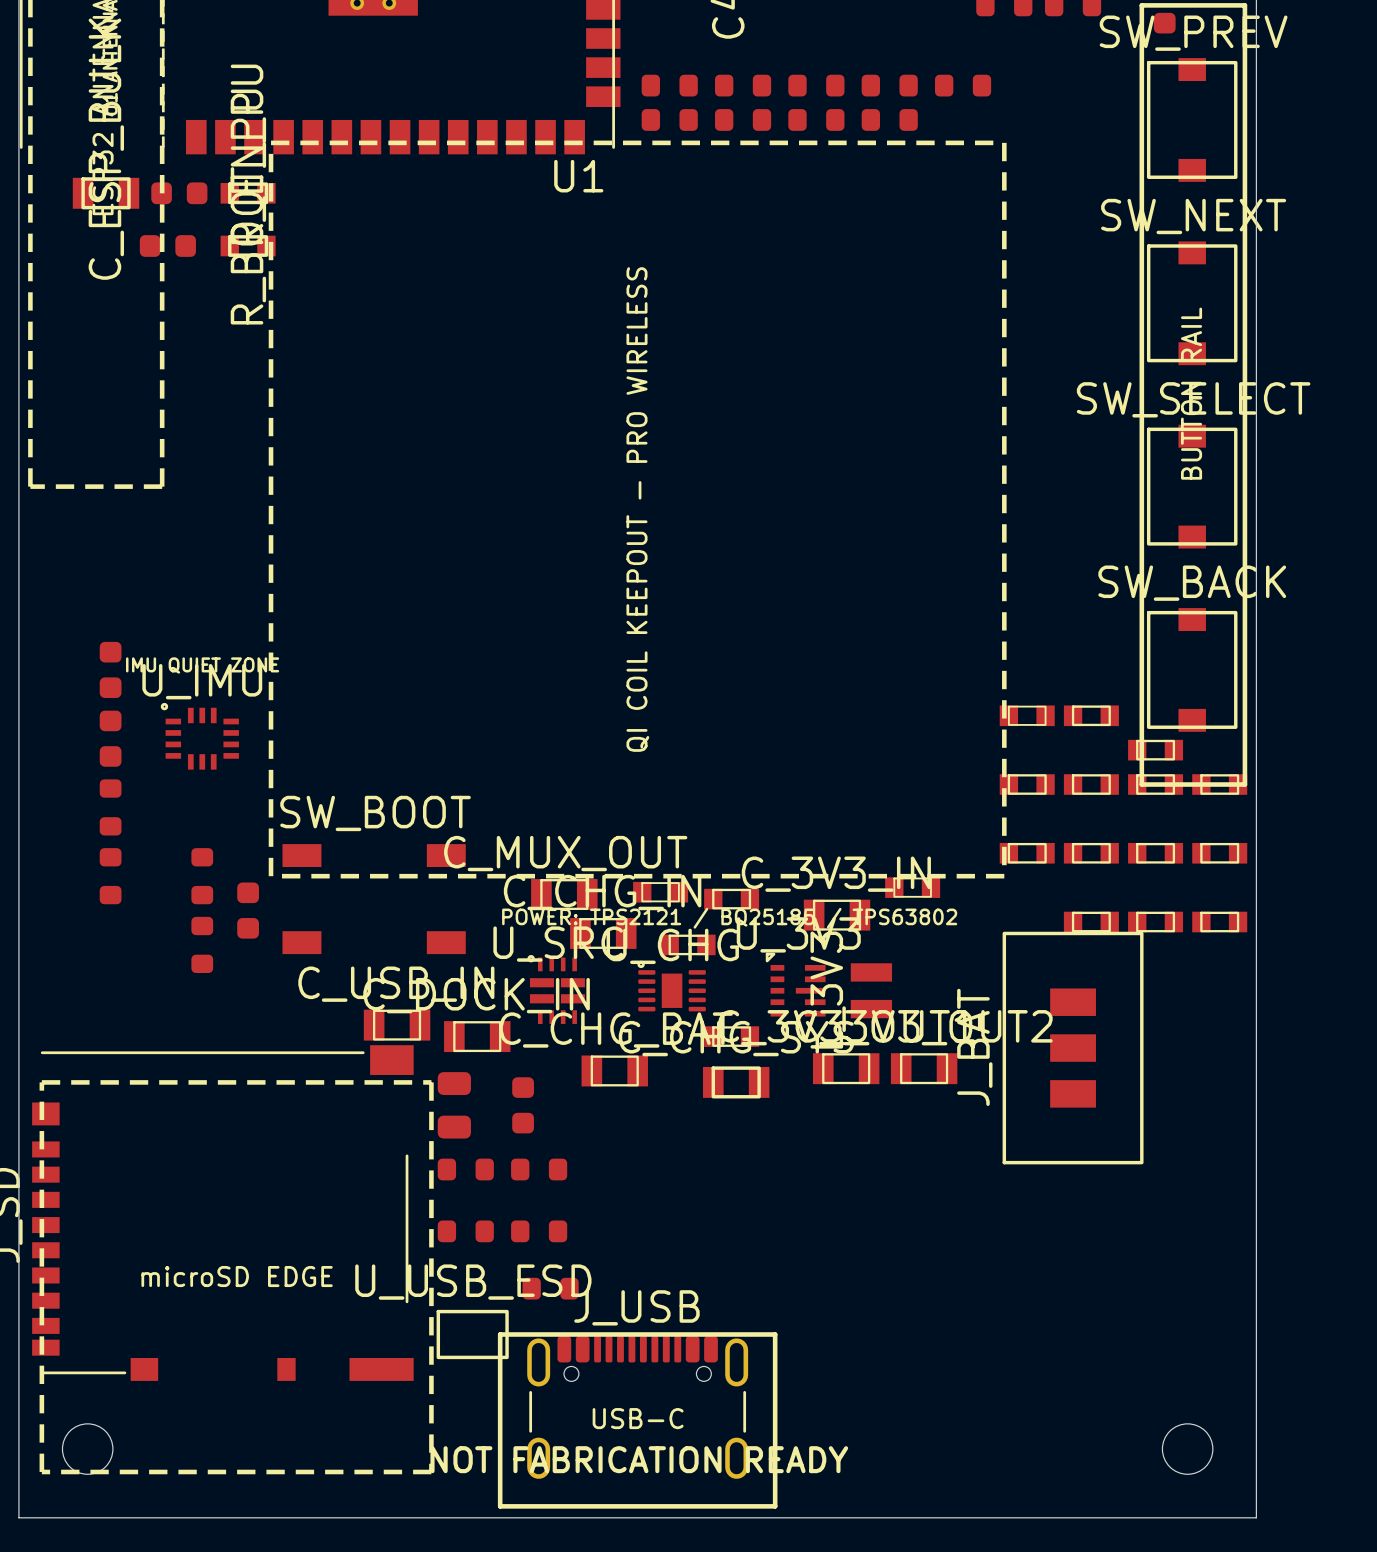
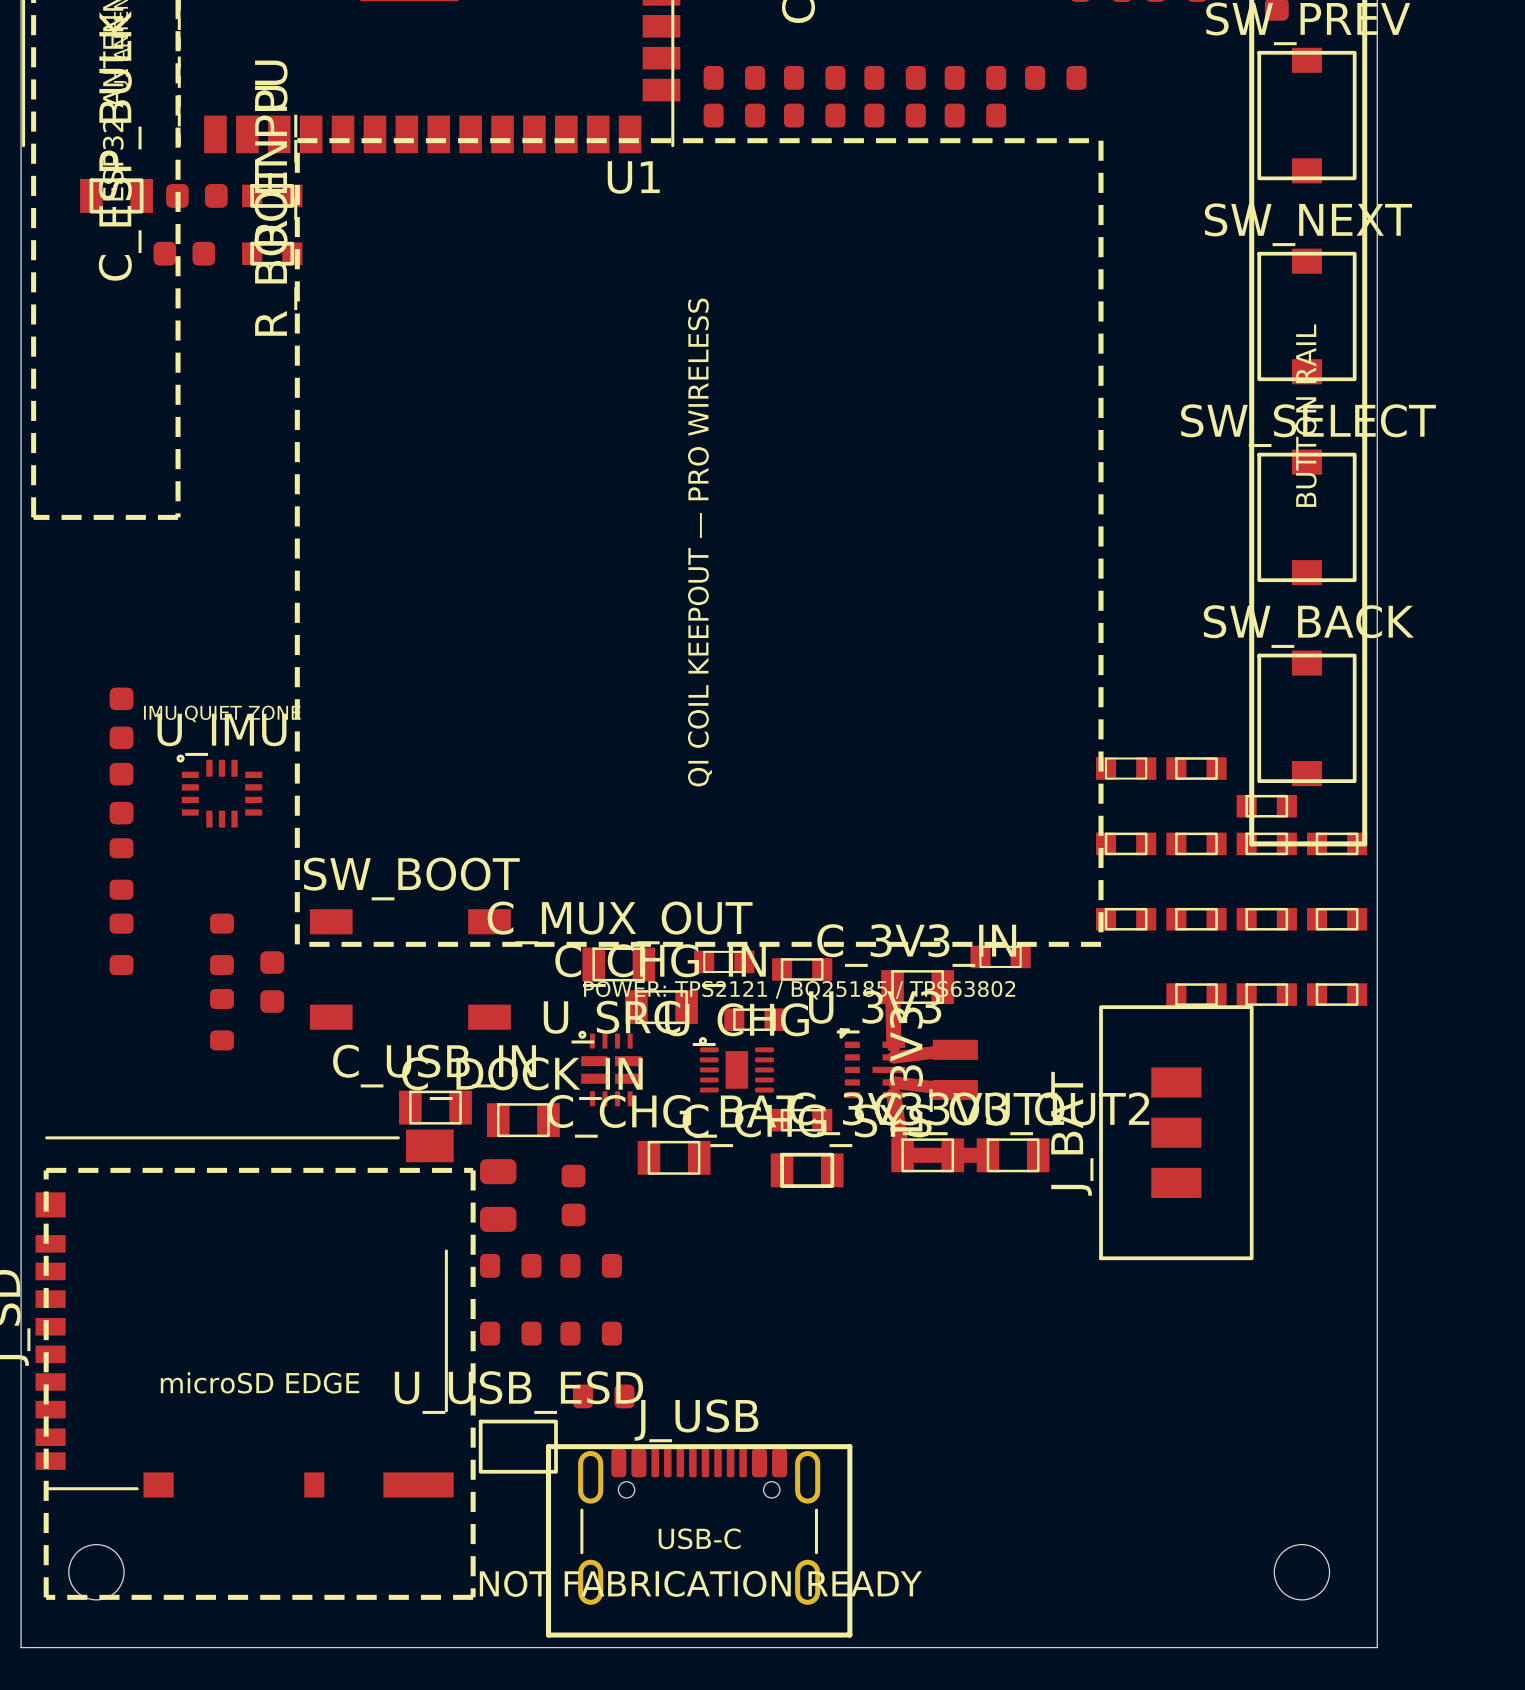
track: none -> (892, 987) (893, 1044)
track: none -> (955, 1049) (893, 1057)
track: none -> (893, 1082) (955, 1090)
track: none -> (893, 1095) (902, 1155) (987, 1155)

